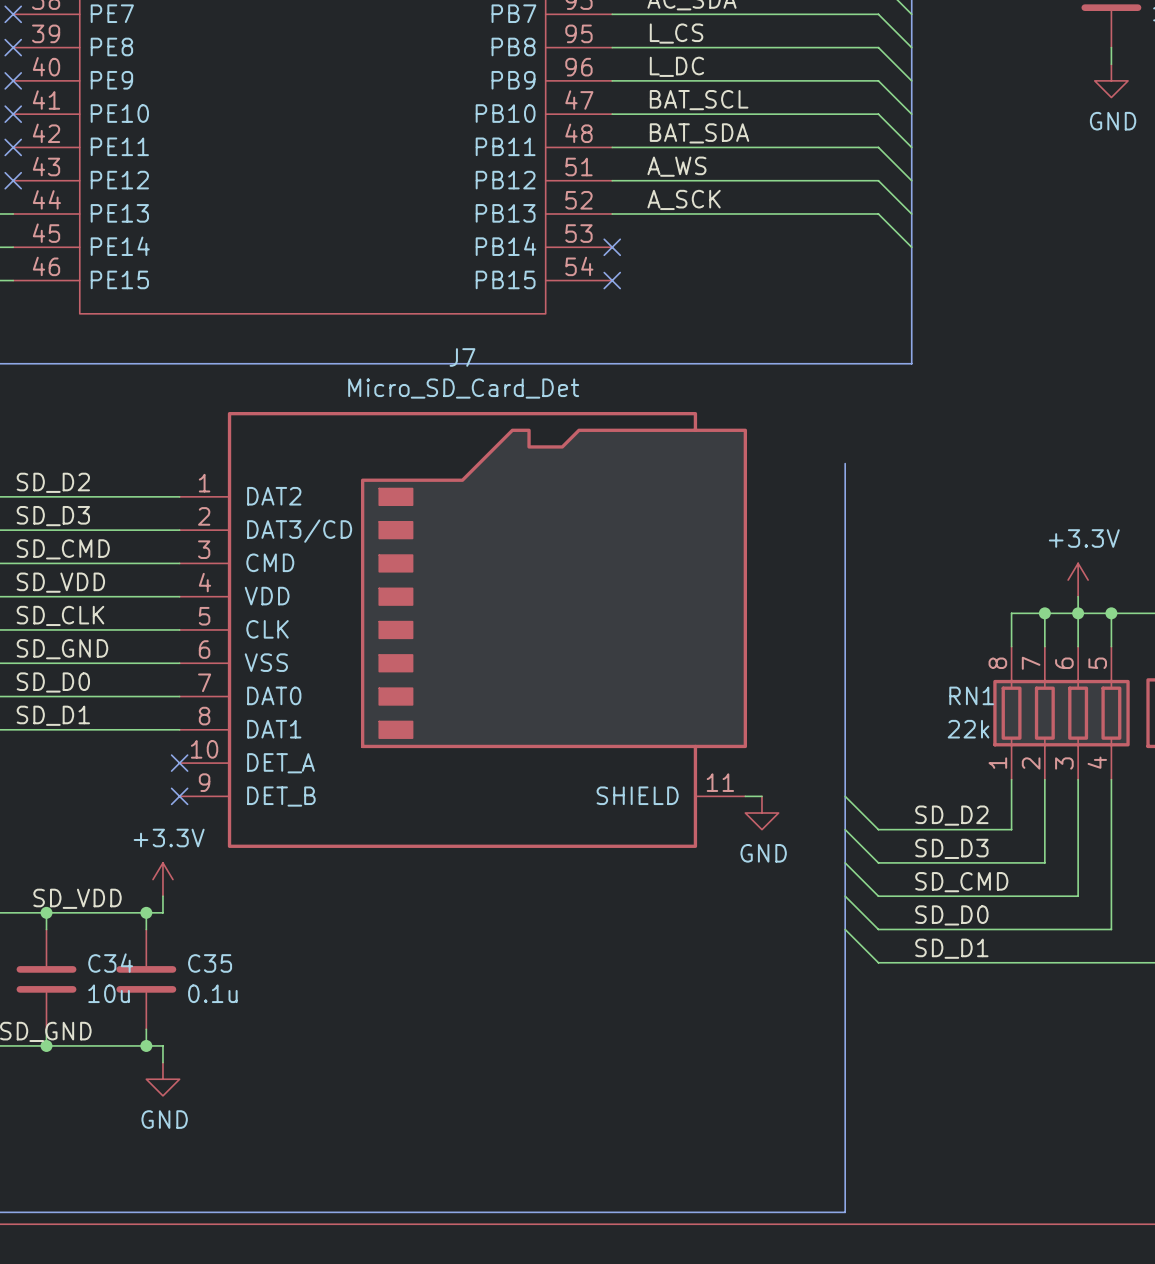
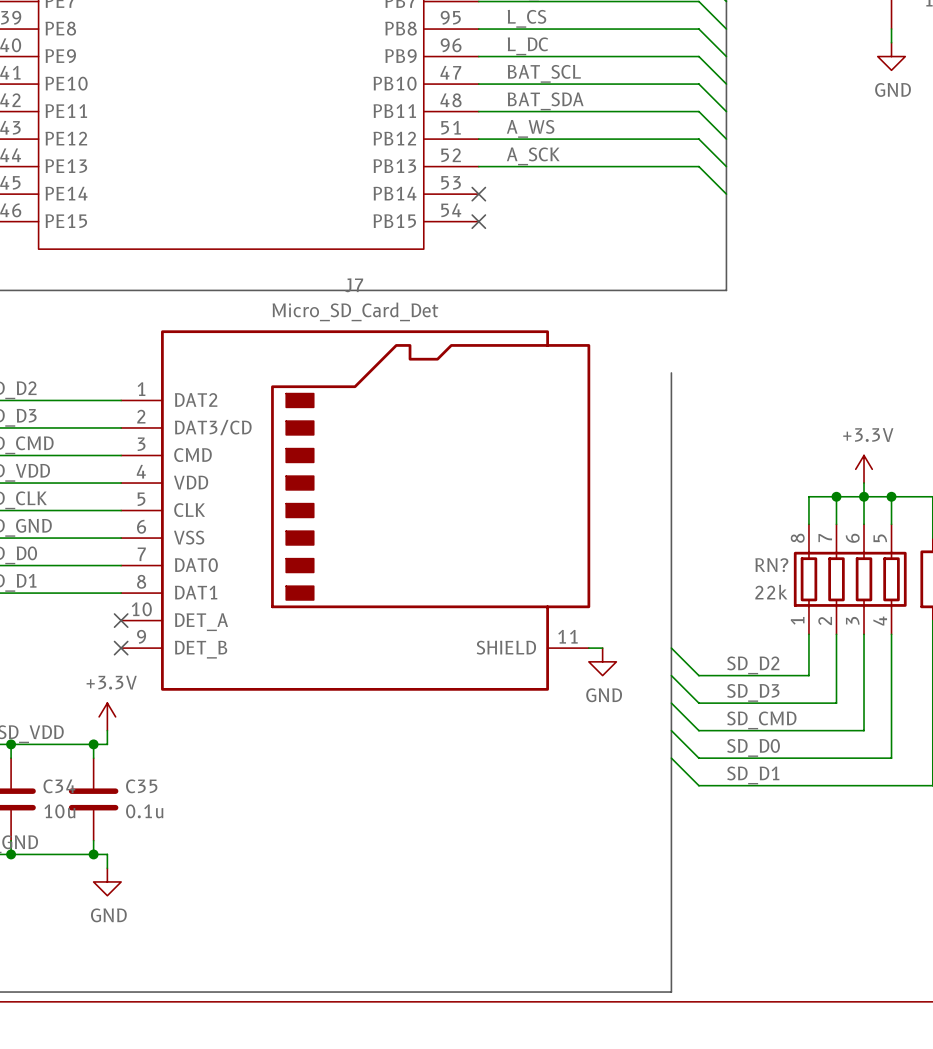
RN1 name: RN1 (971, 695) -> RN? (771, 565)

